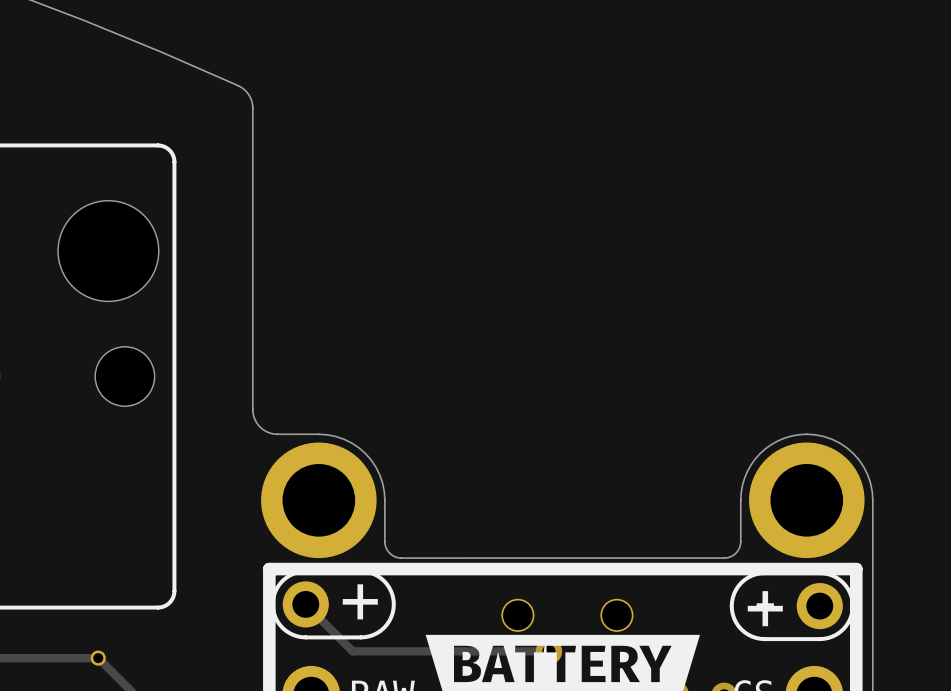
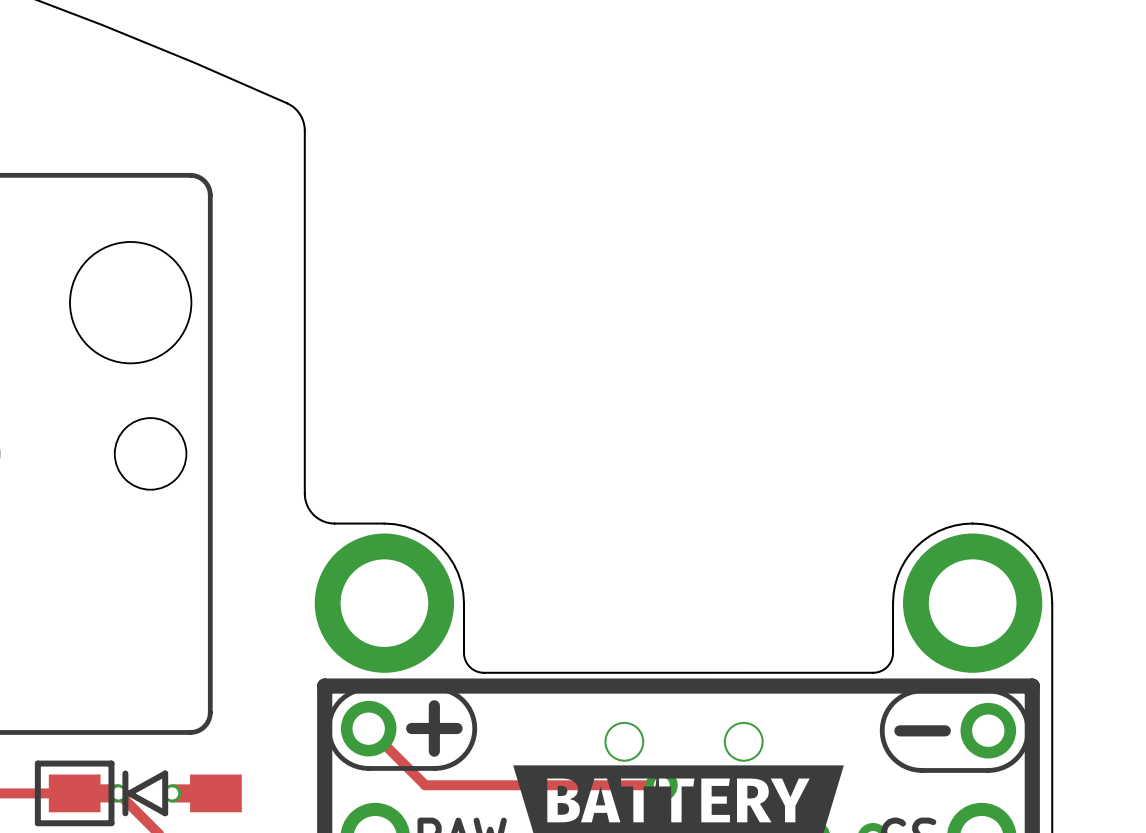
part footprint: [729, 571, 855, 642] -> [879, 688, 1031, 773]
part footprint: [90, 650, 106, 666] -> [34, 760, 242, 827]
track: (61, 658) (98, 658) -> none

